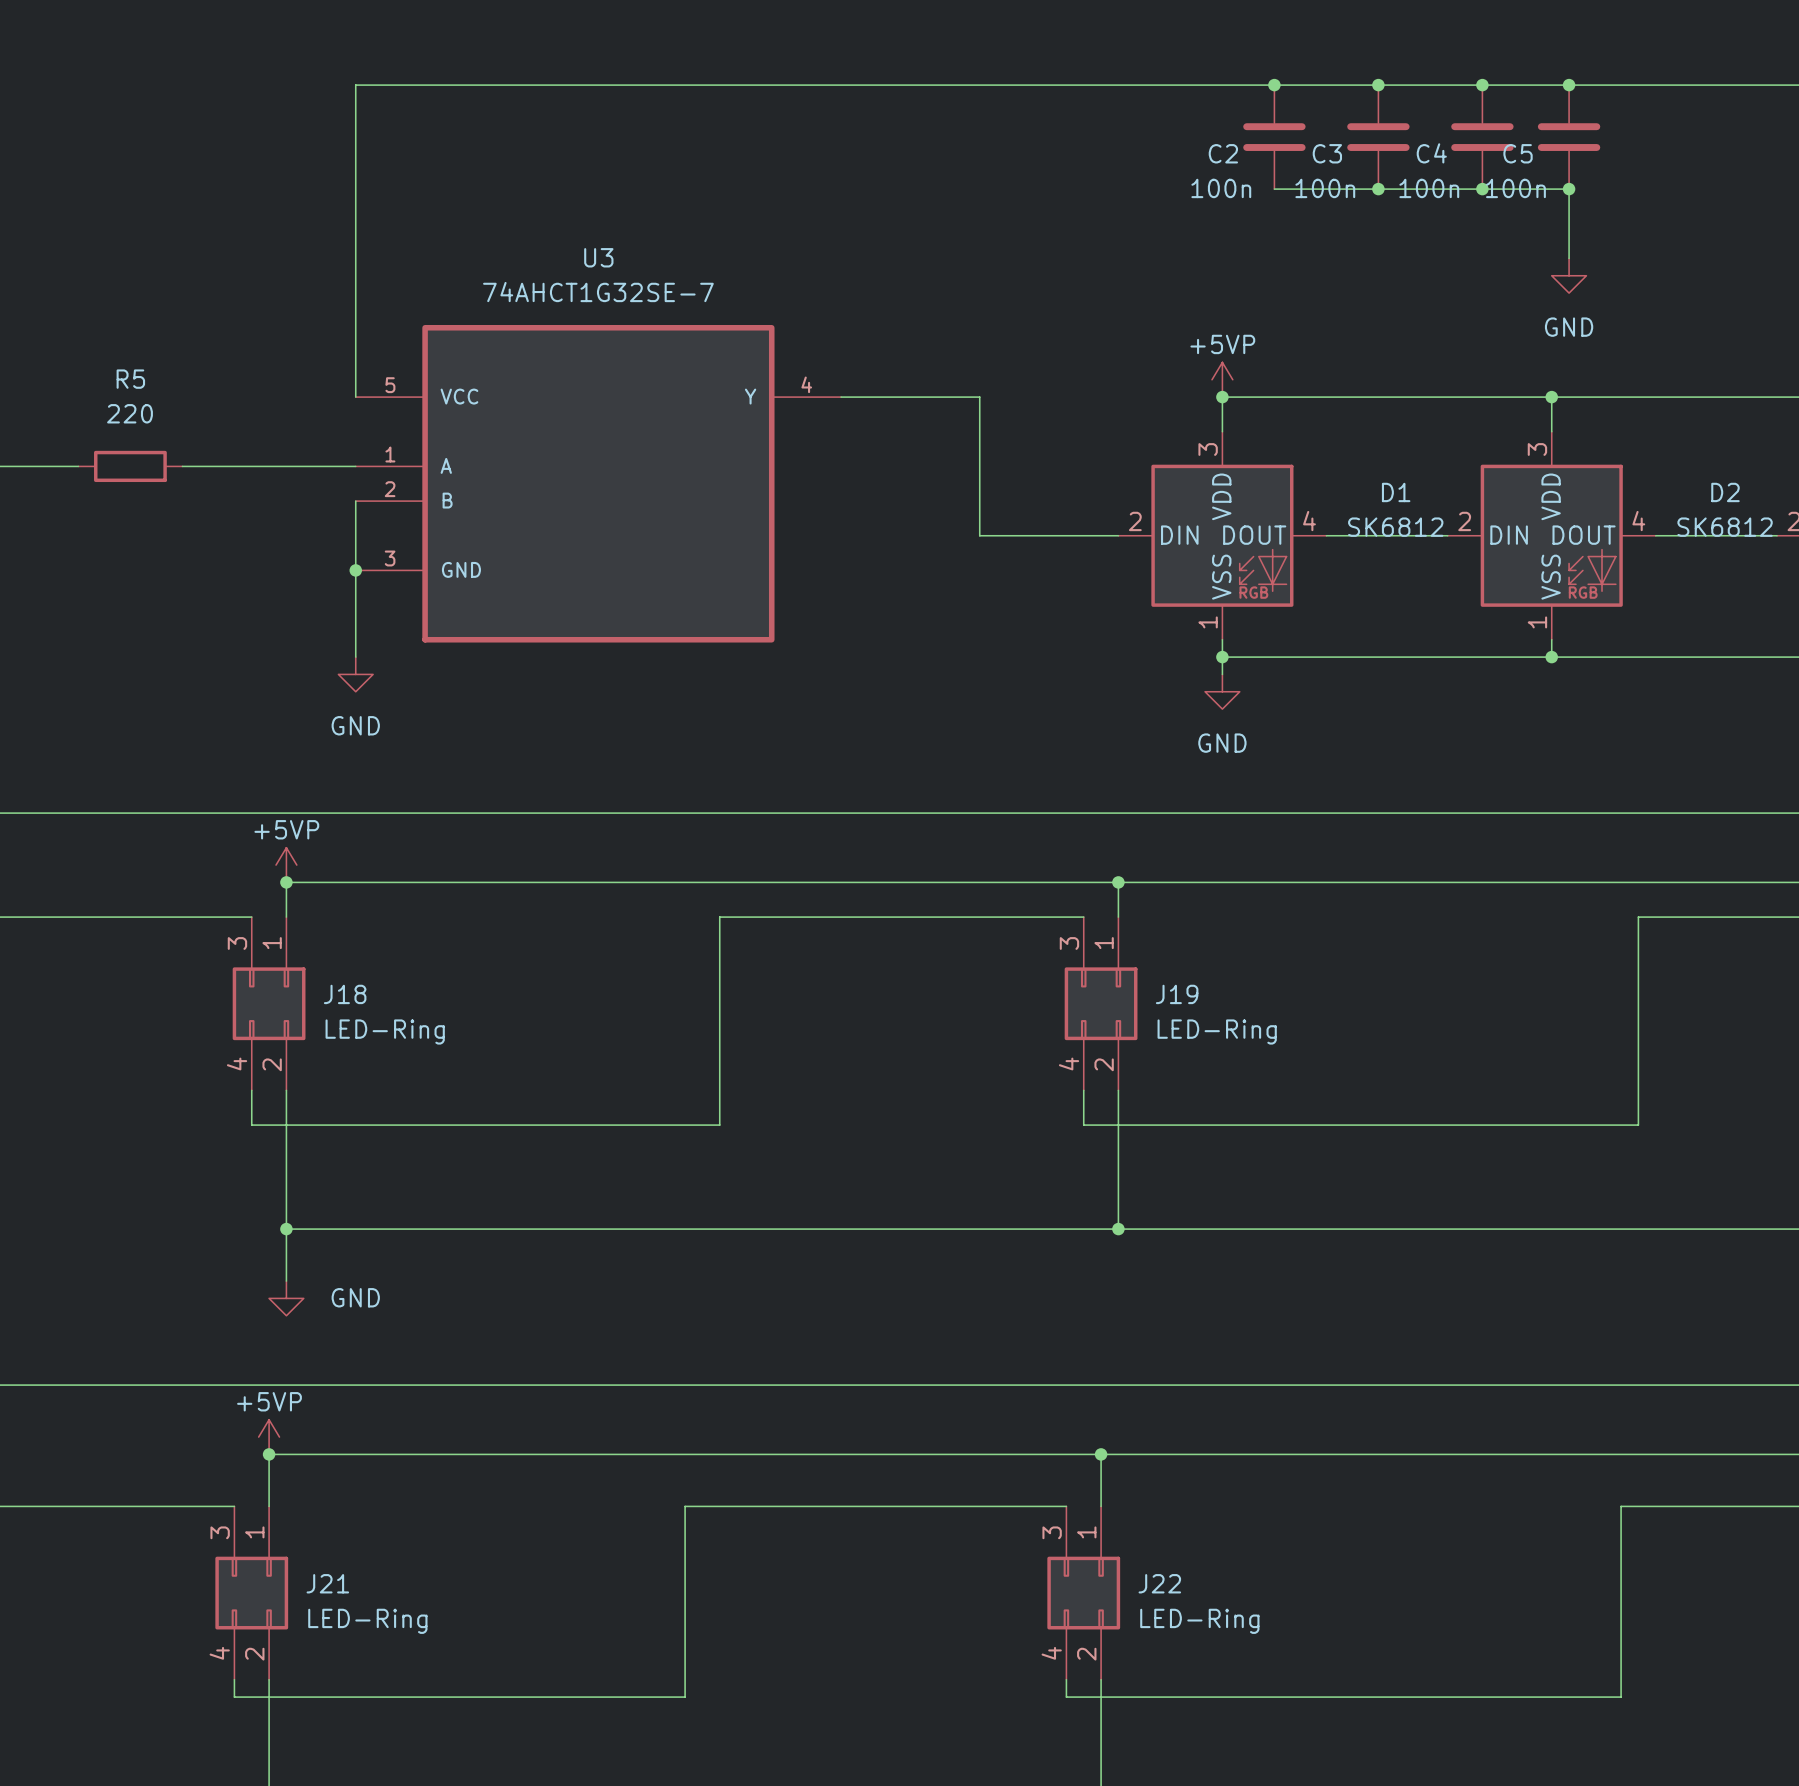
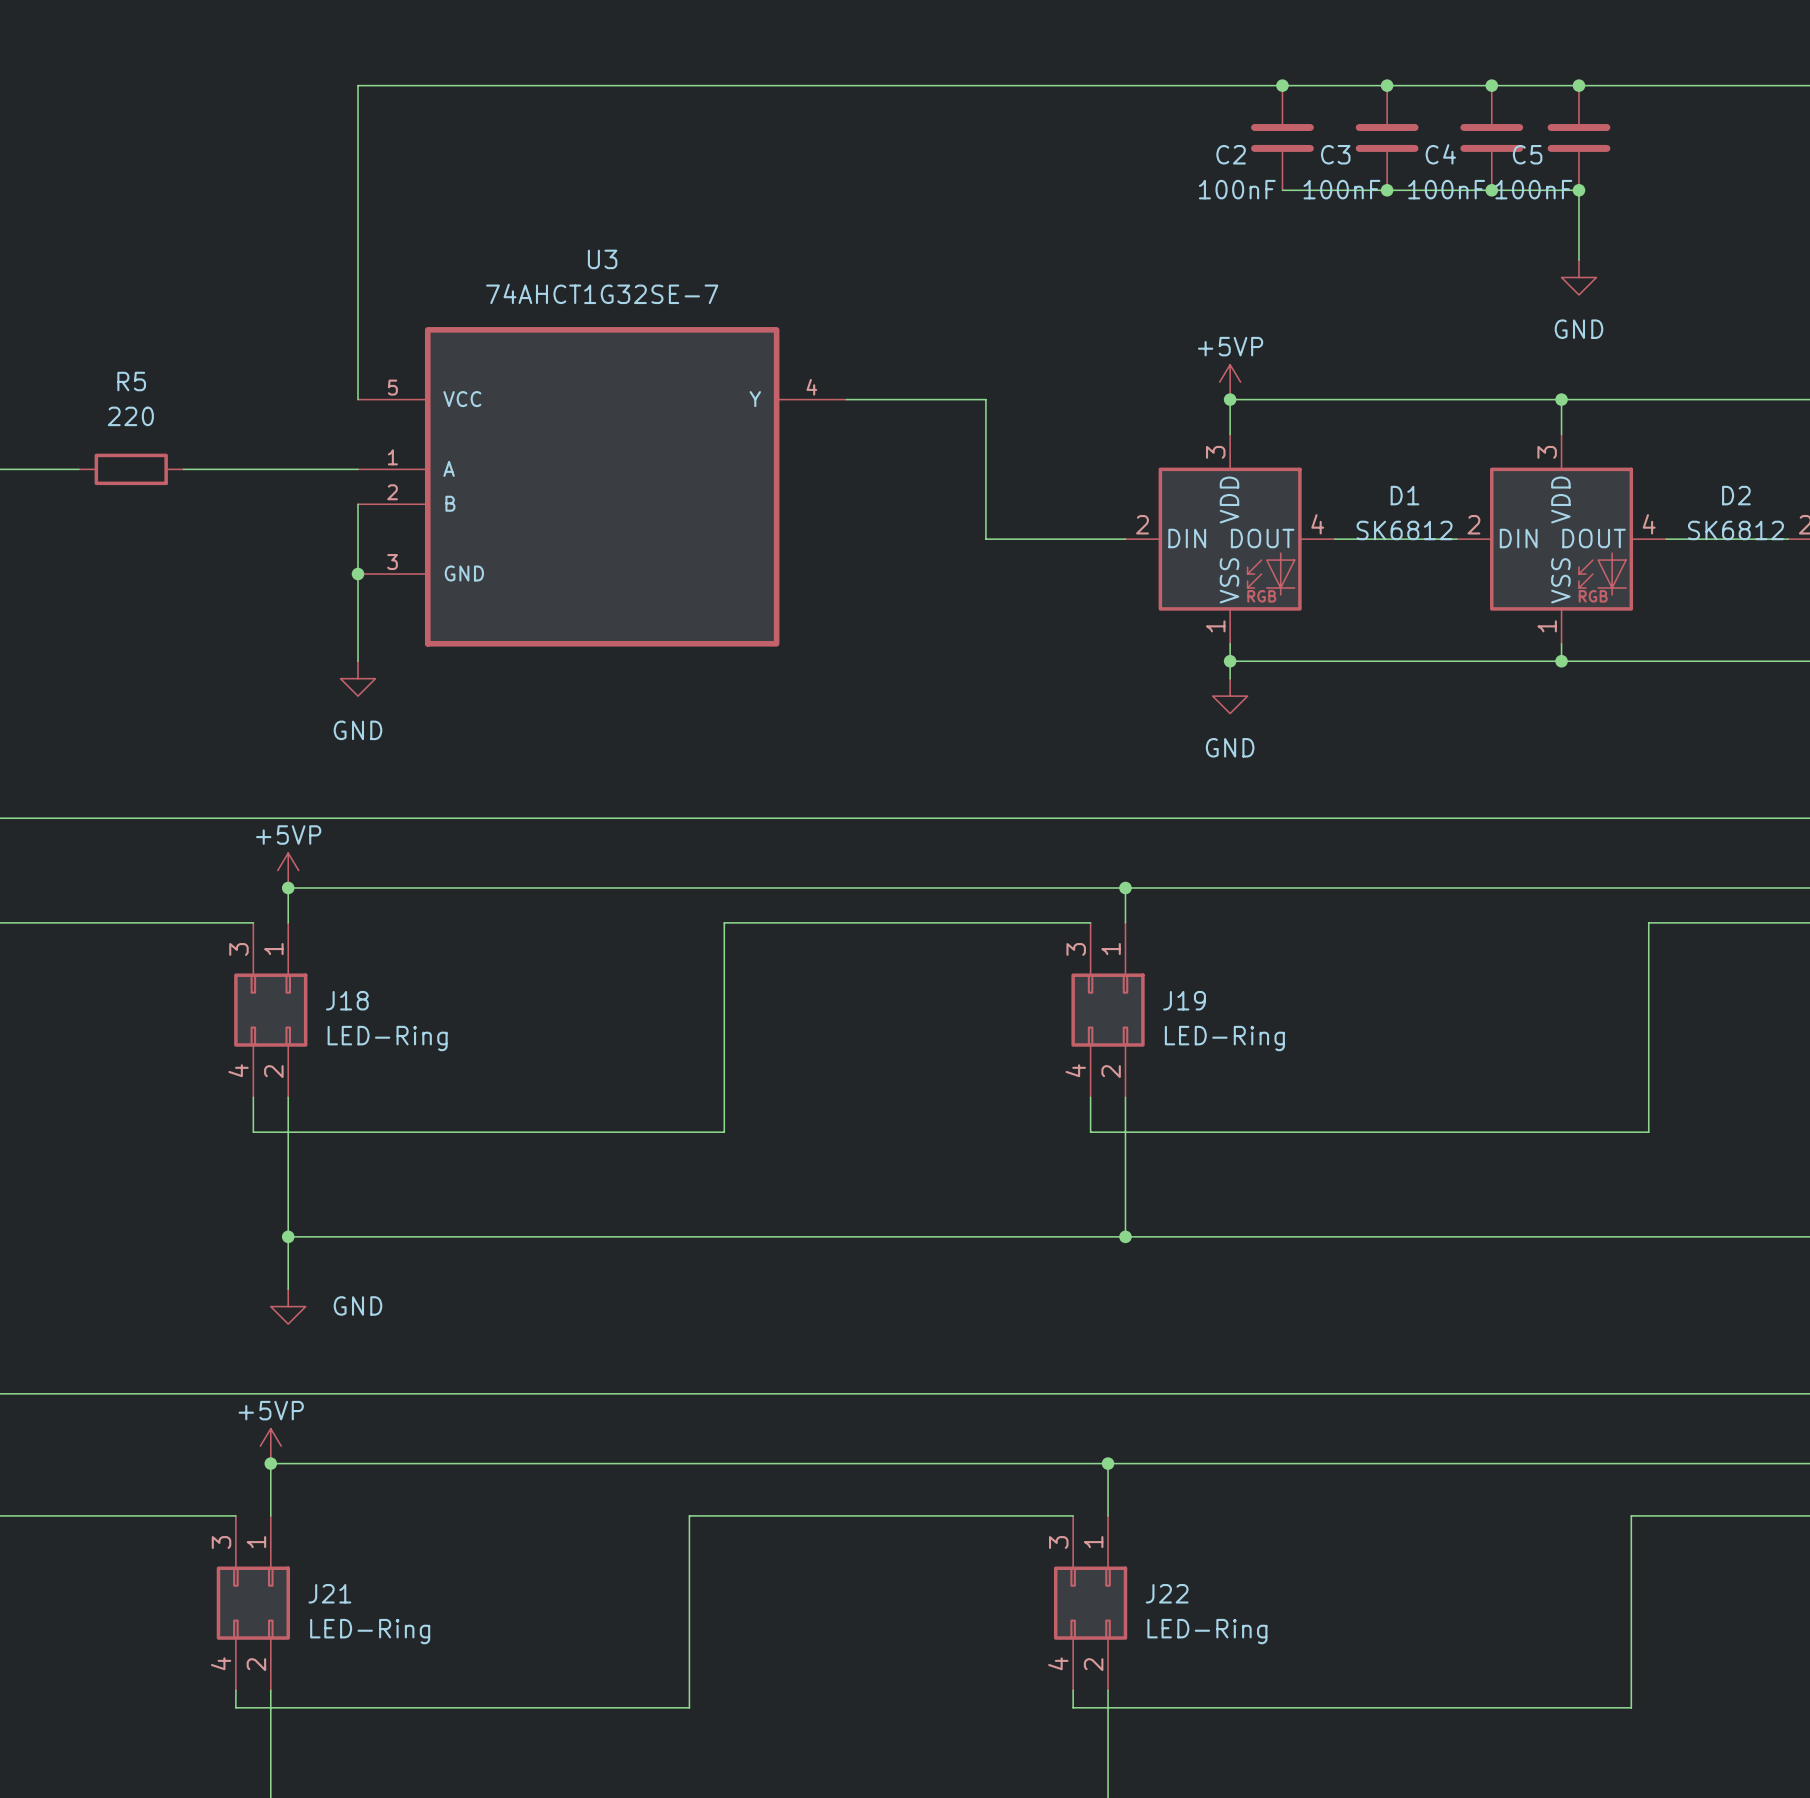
C2 value: 100n (1221, 188) -> 100nF (1237, 189)
C3 value: 100n (1325, 188) -> 100nF (1341, 189)
C4 value: 100n (1429, 188) -> 100nF (1446, 189)
C5 value: 100n (1515, 188) -> 100nF (1533, 189)

